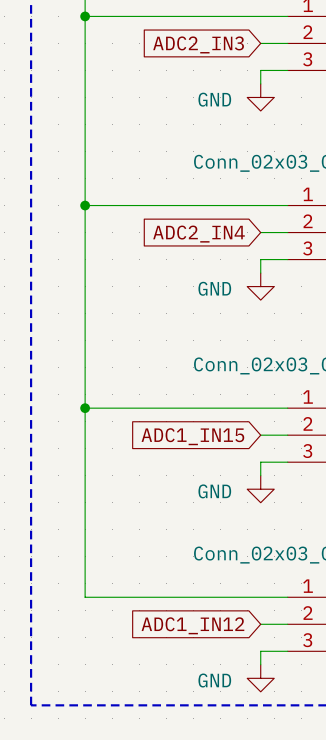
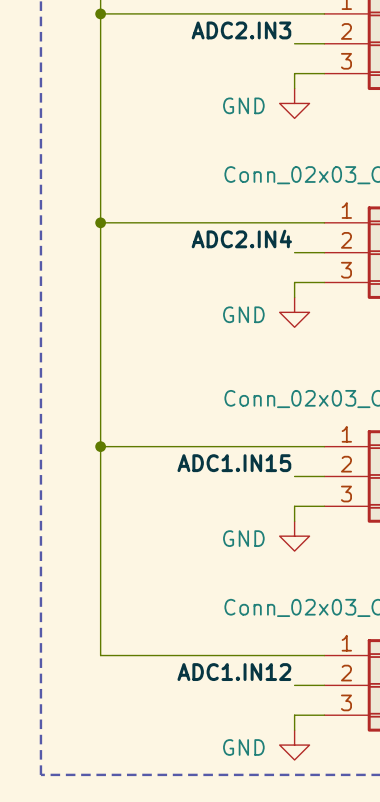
label: none -> ADC2.IN3 (241, 30)
global label: ADC2_IN3 (198, 44) -> none
label: none -> ADC2.IN4 (241, 238)
global label: ADC2_IN4 (199, 234) -> none
label: none -> ADC1.IN15 (234, 463)
global label: ADC1_IN15 (192, 436) -> none
label: none -> ADC1.IN12 (234, 672)
global label: ADC1_IN12 (192, 625) -> none

